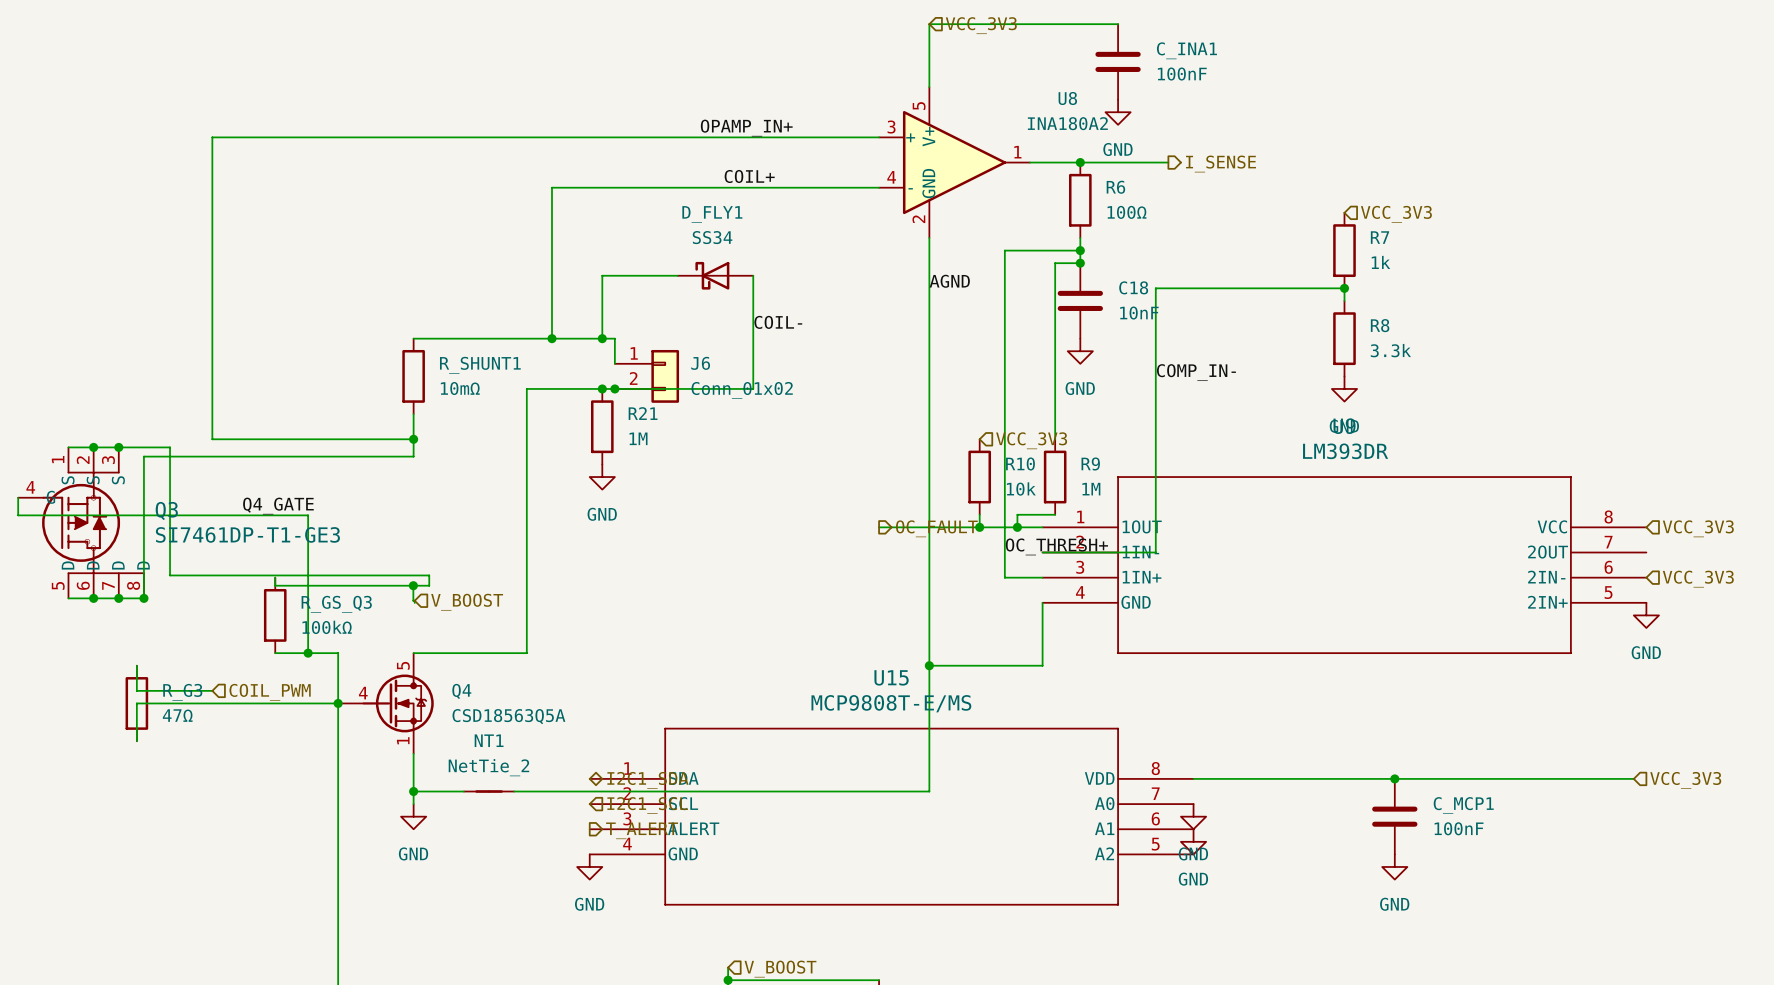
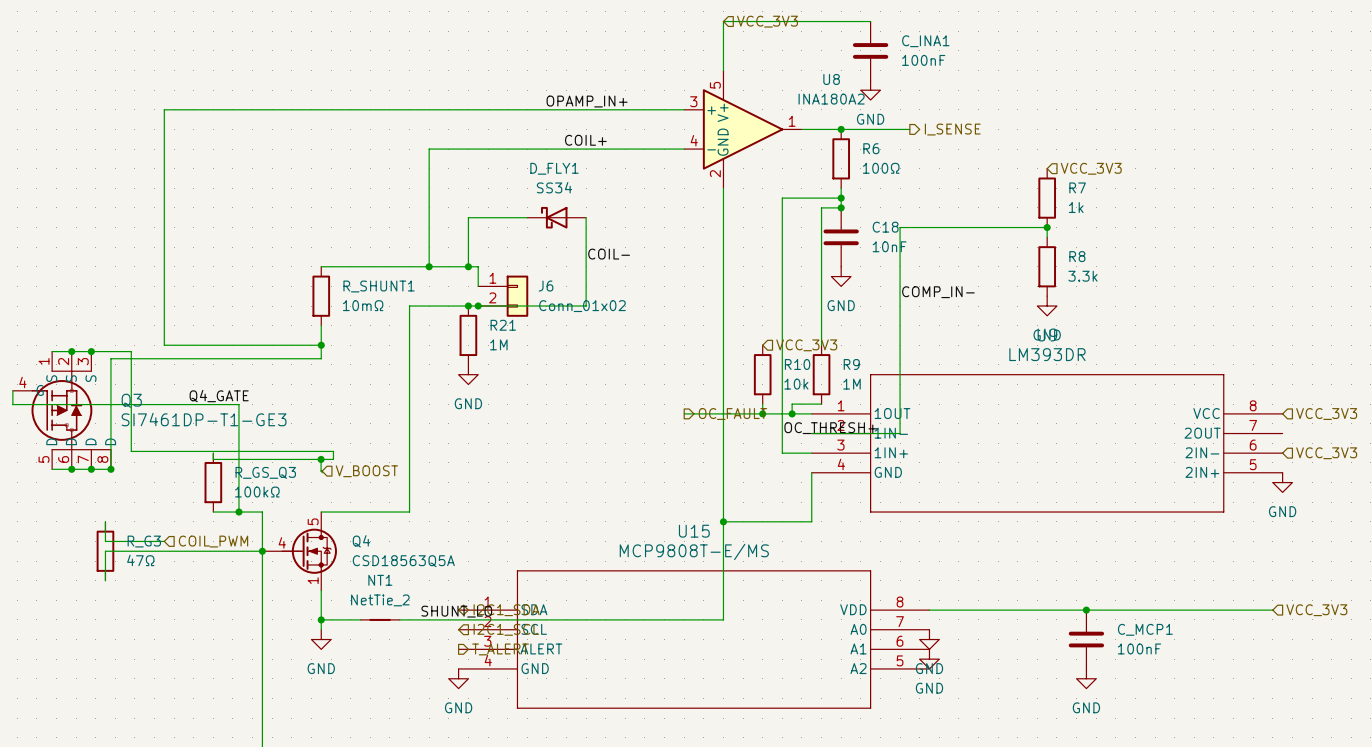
label: AGND (949, 281) -> none
label: none -> SHUNT_LO (456, 611)

